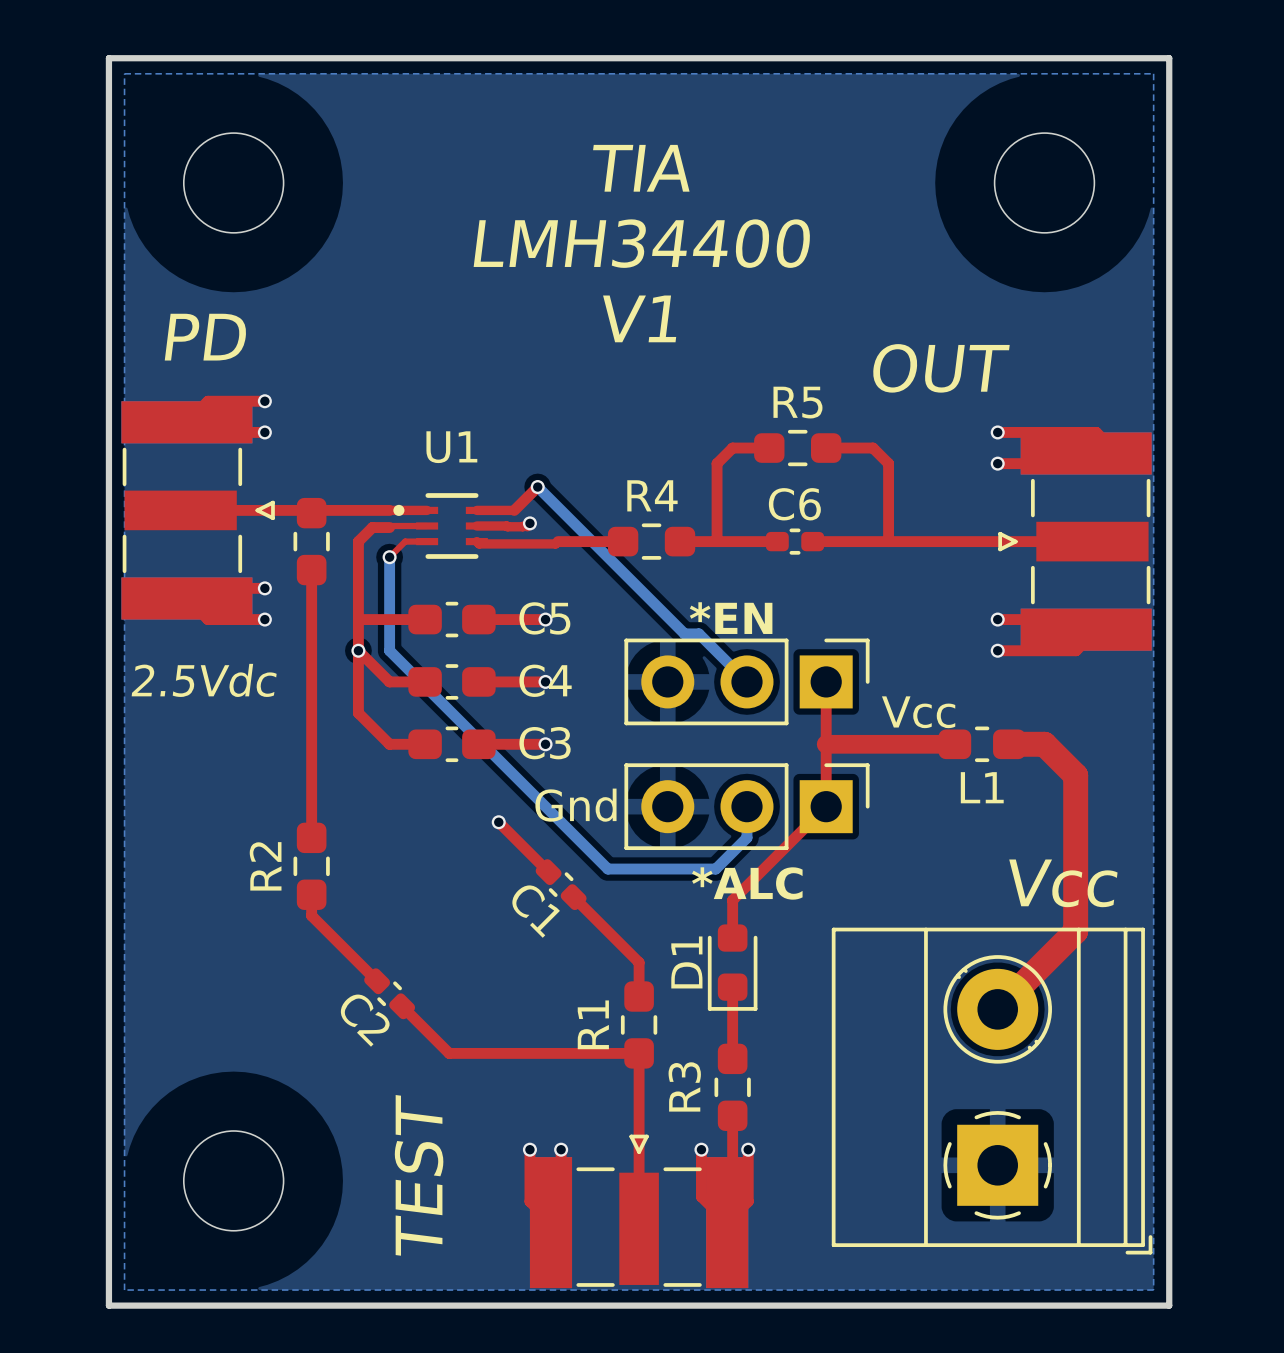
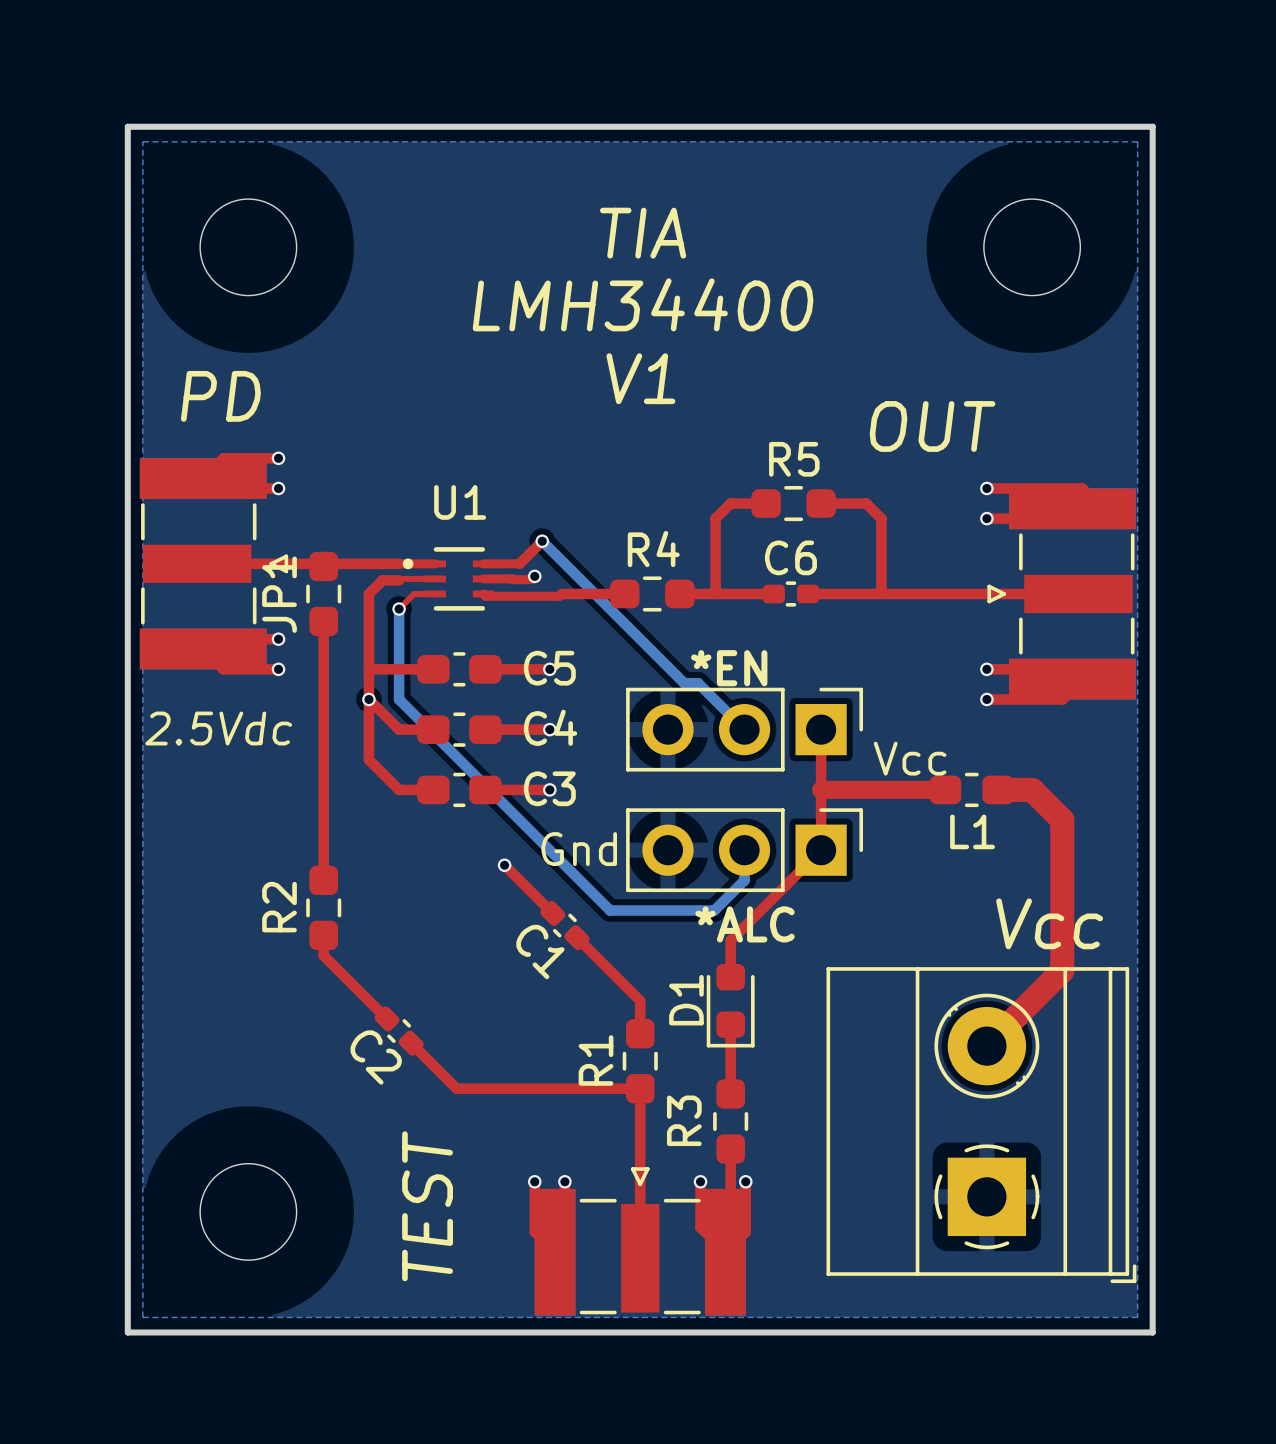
JP1 name: none -> JP1 (279, 594)

